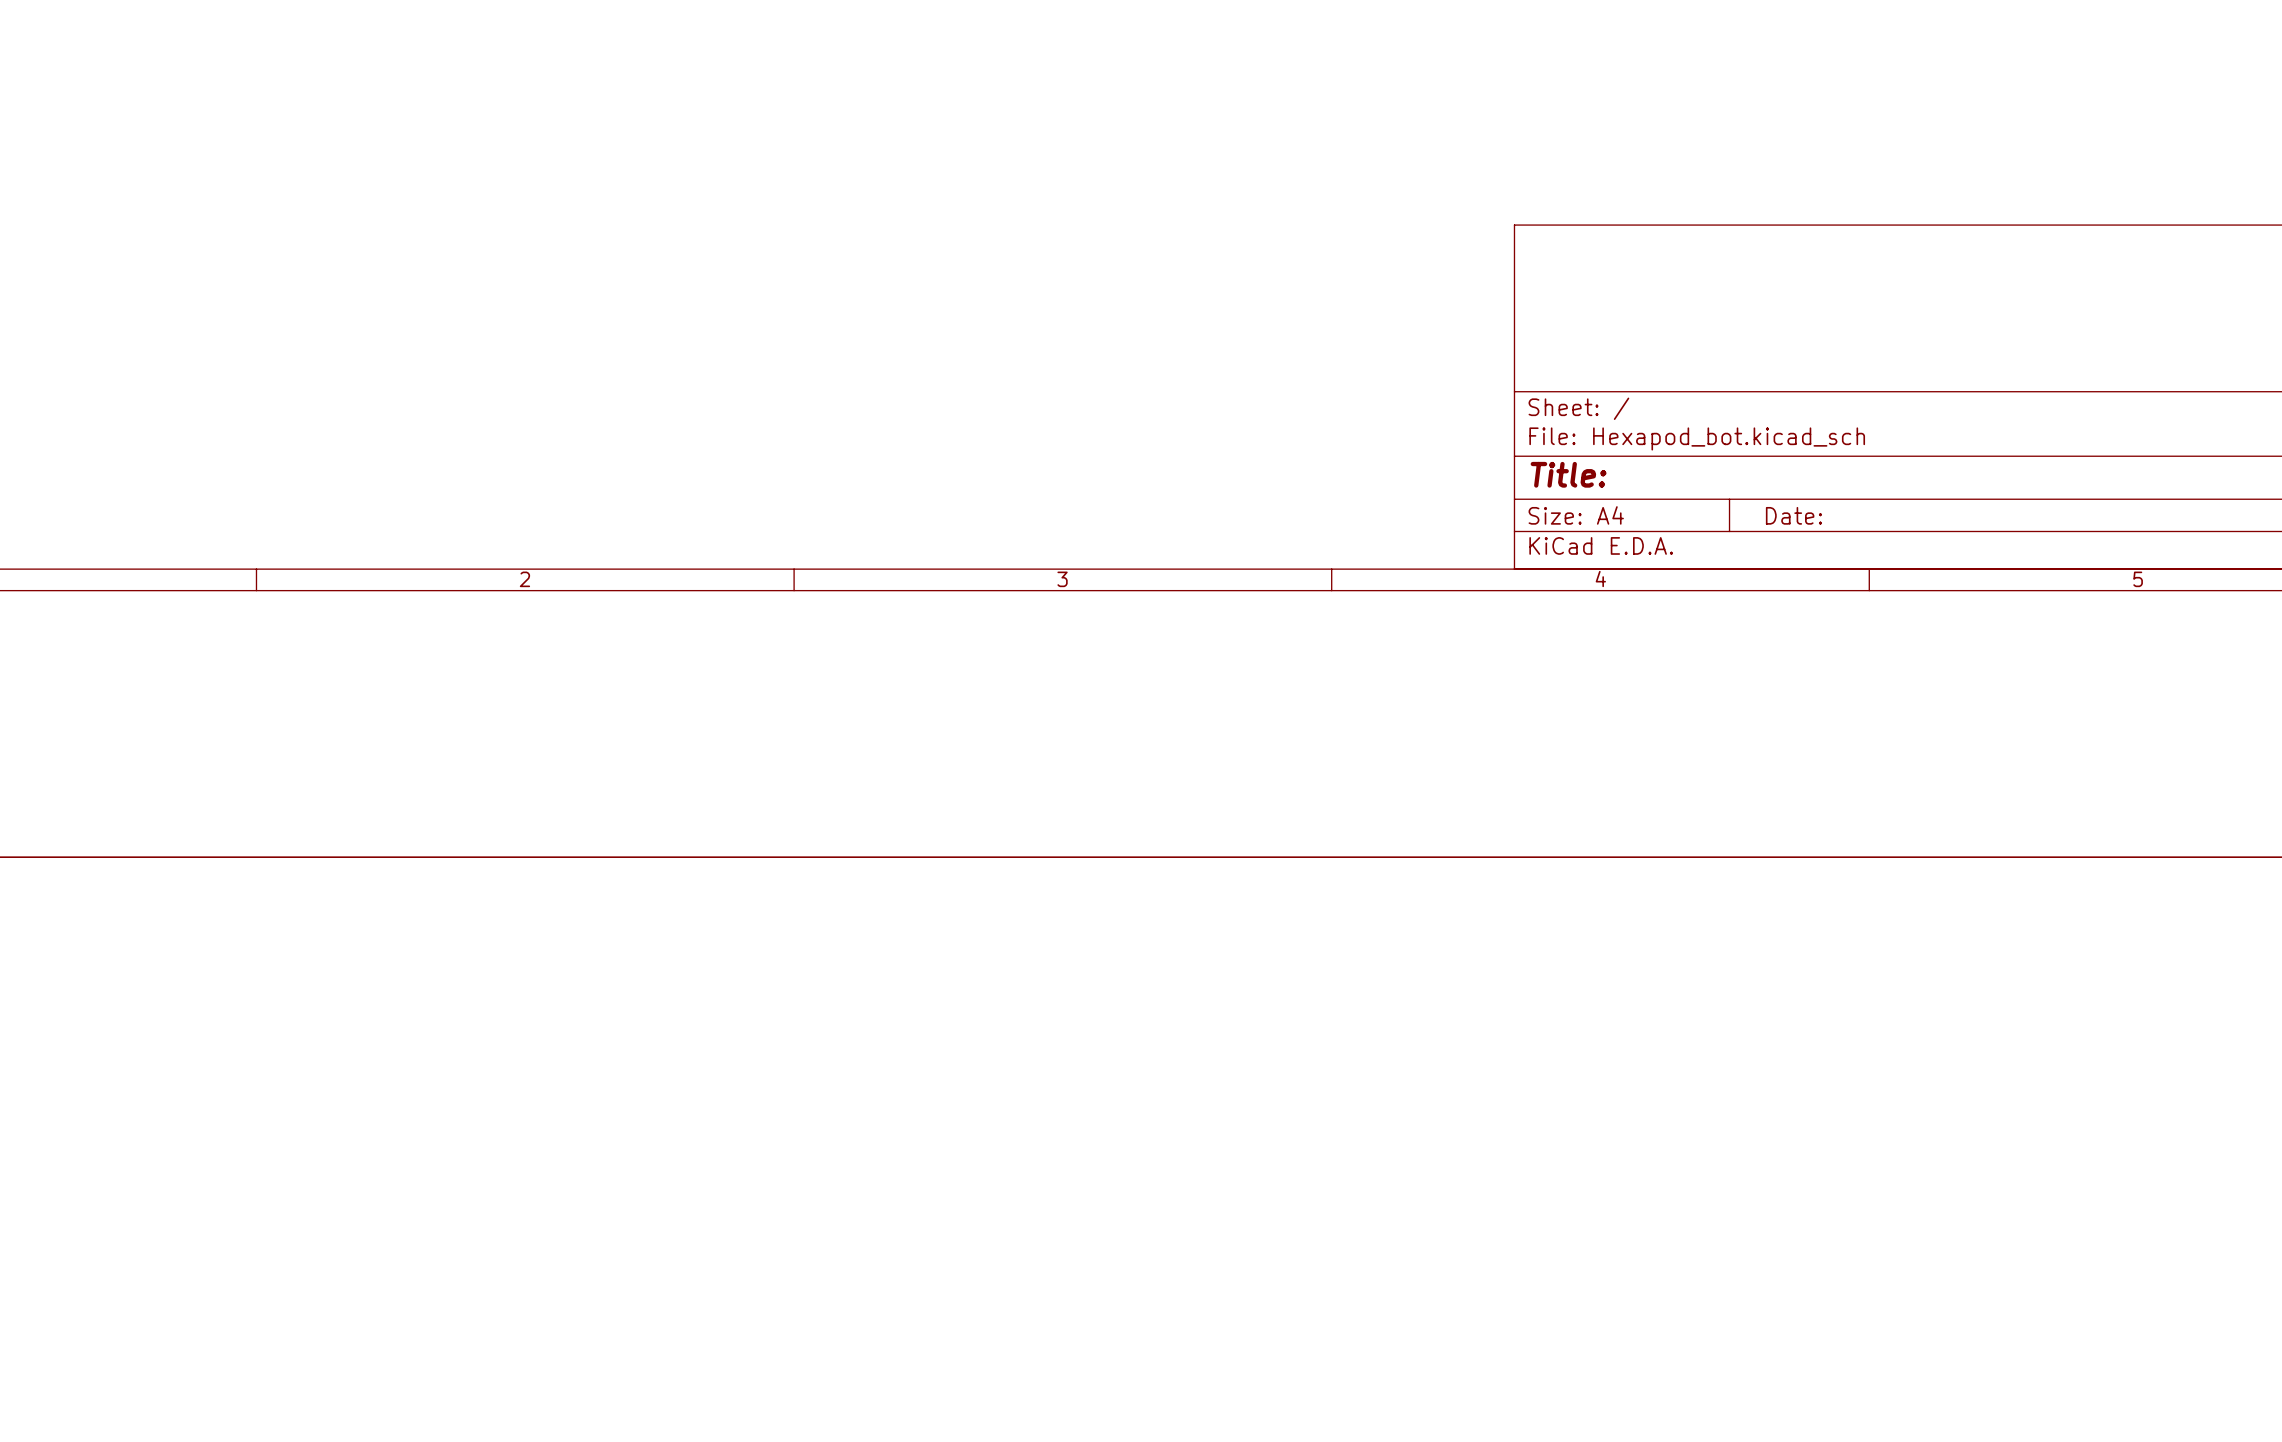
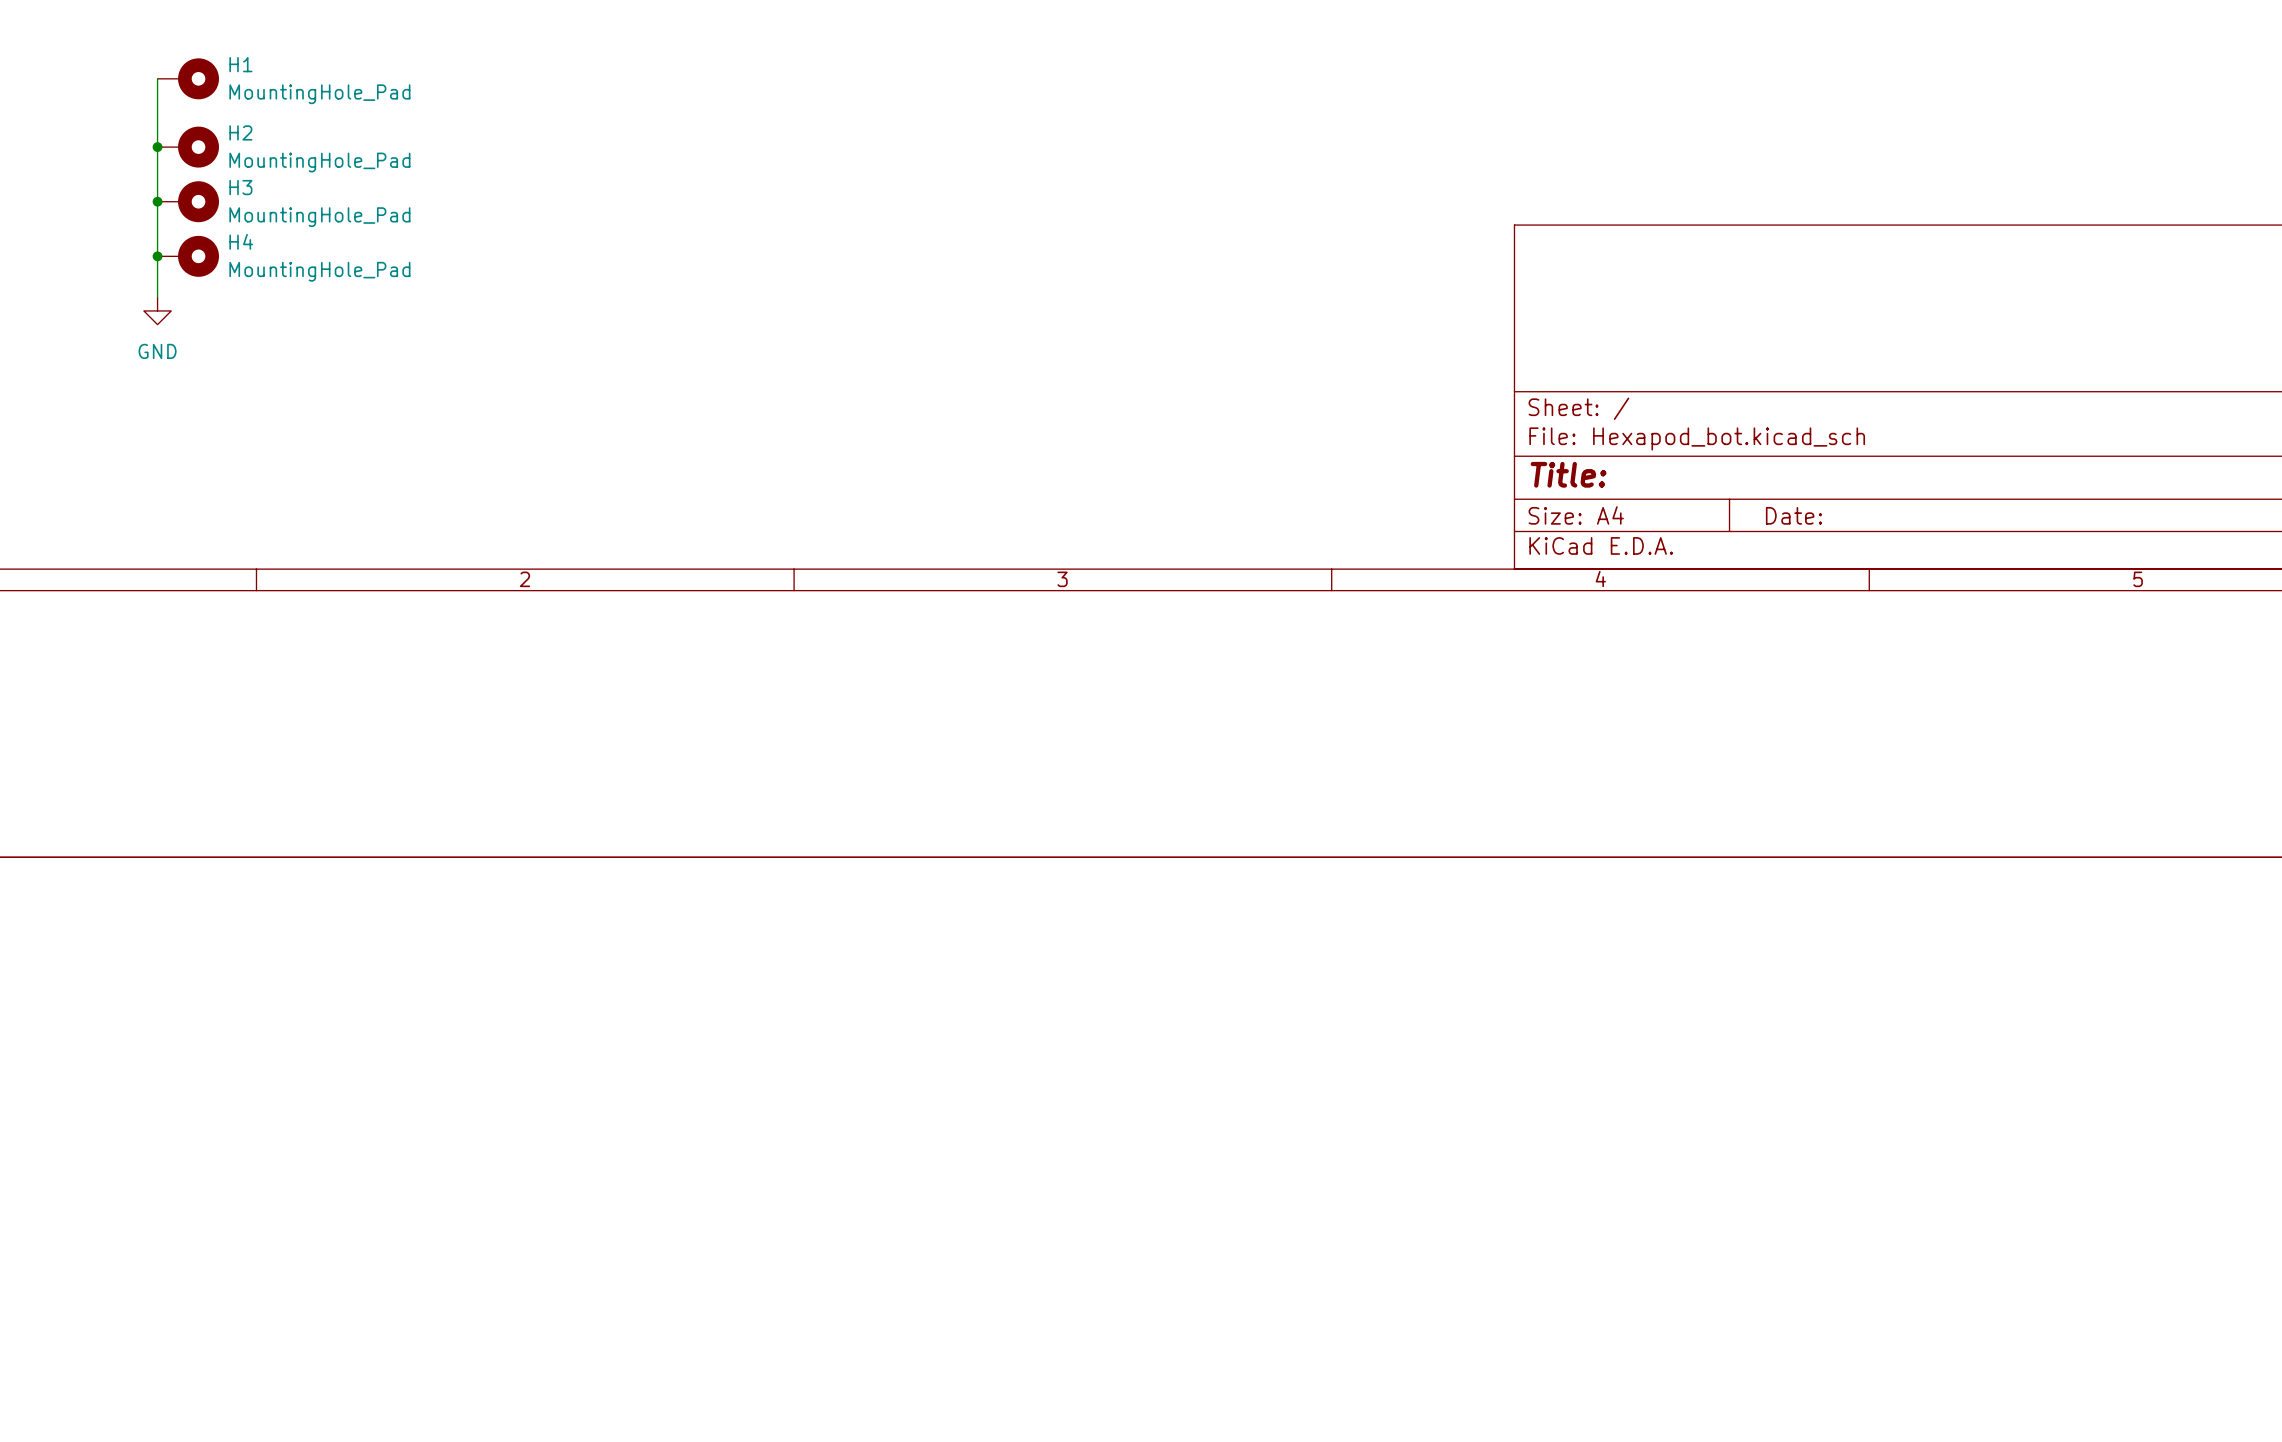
wire: none -> (157, 78) (157, 297)
H1: none -> MountingHole_Pad (188, 78)
junction: none -> (157, 147)
H2: none -> MountingHole_Pad (188, 147)
junction: none -> (157, 201)
H3: none -> MountingHole_Pad (188, 201)
junction: none -> (157, 256)
H4: none -> MountingHole_Pad (188, 256)
power symbol: none -> GND (157, 310)

